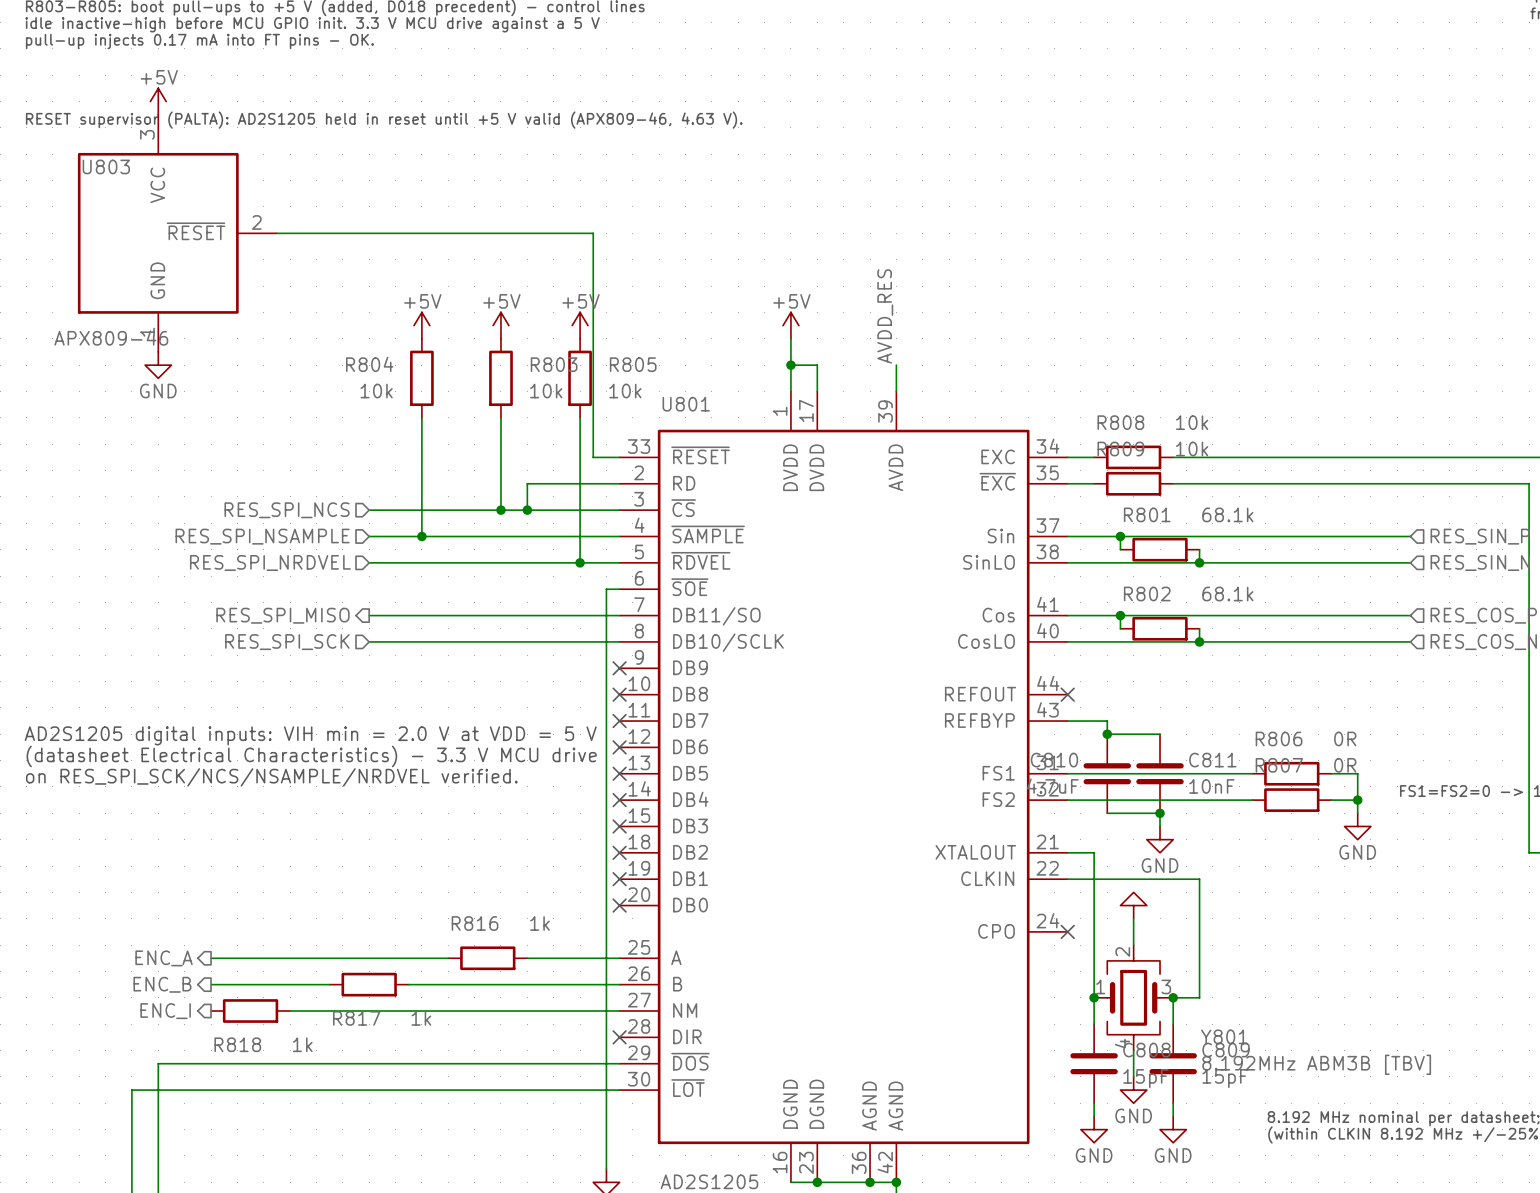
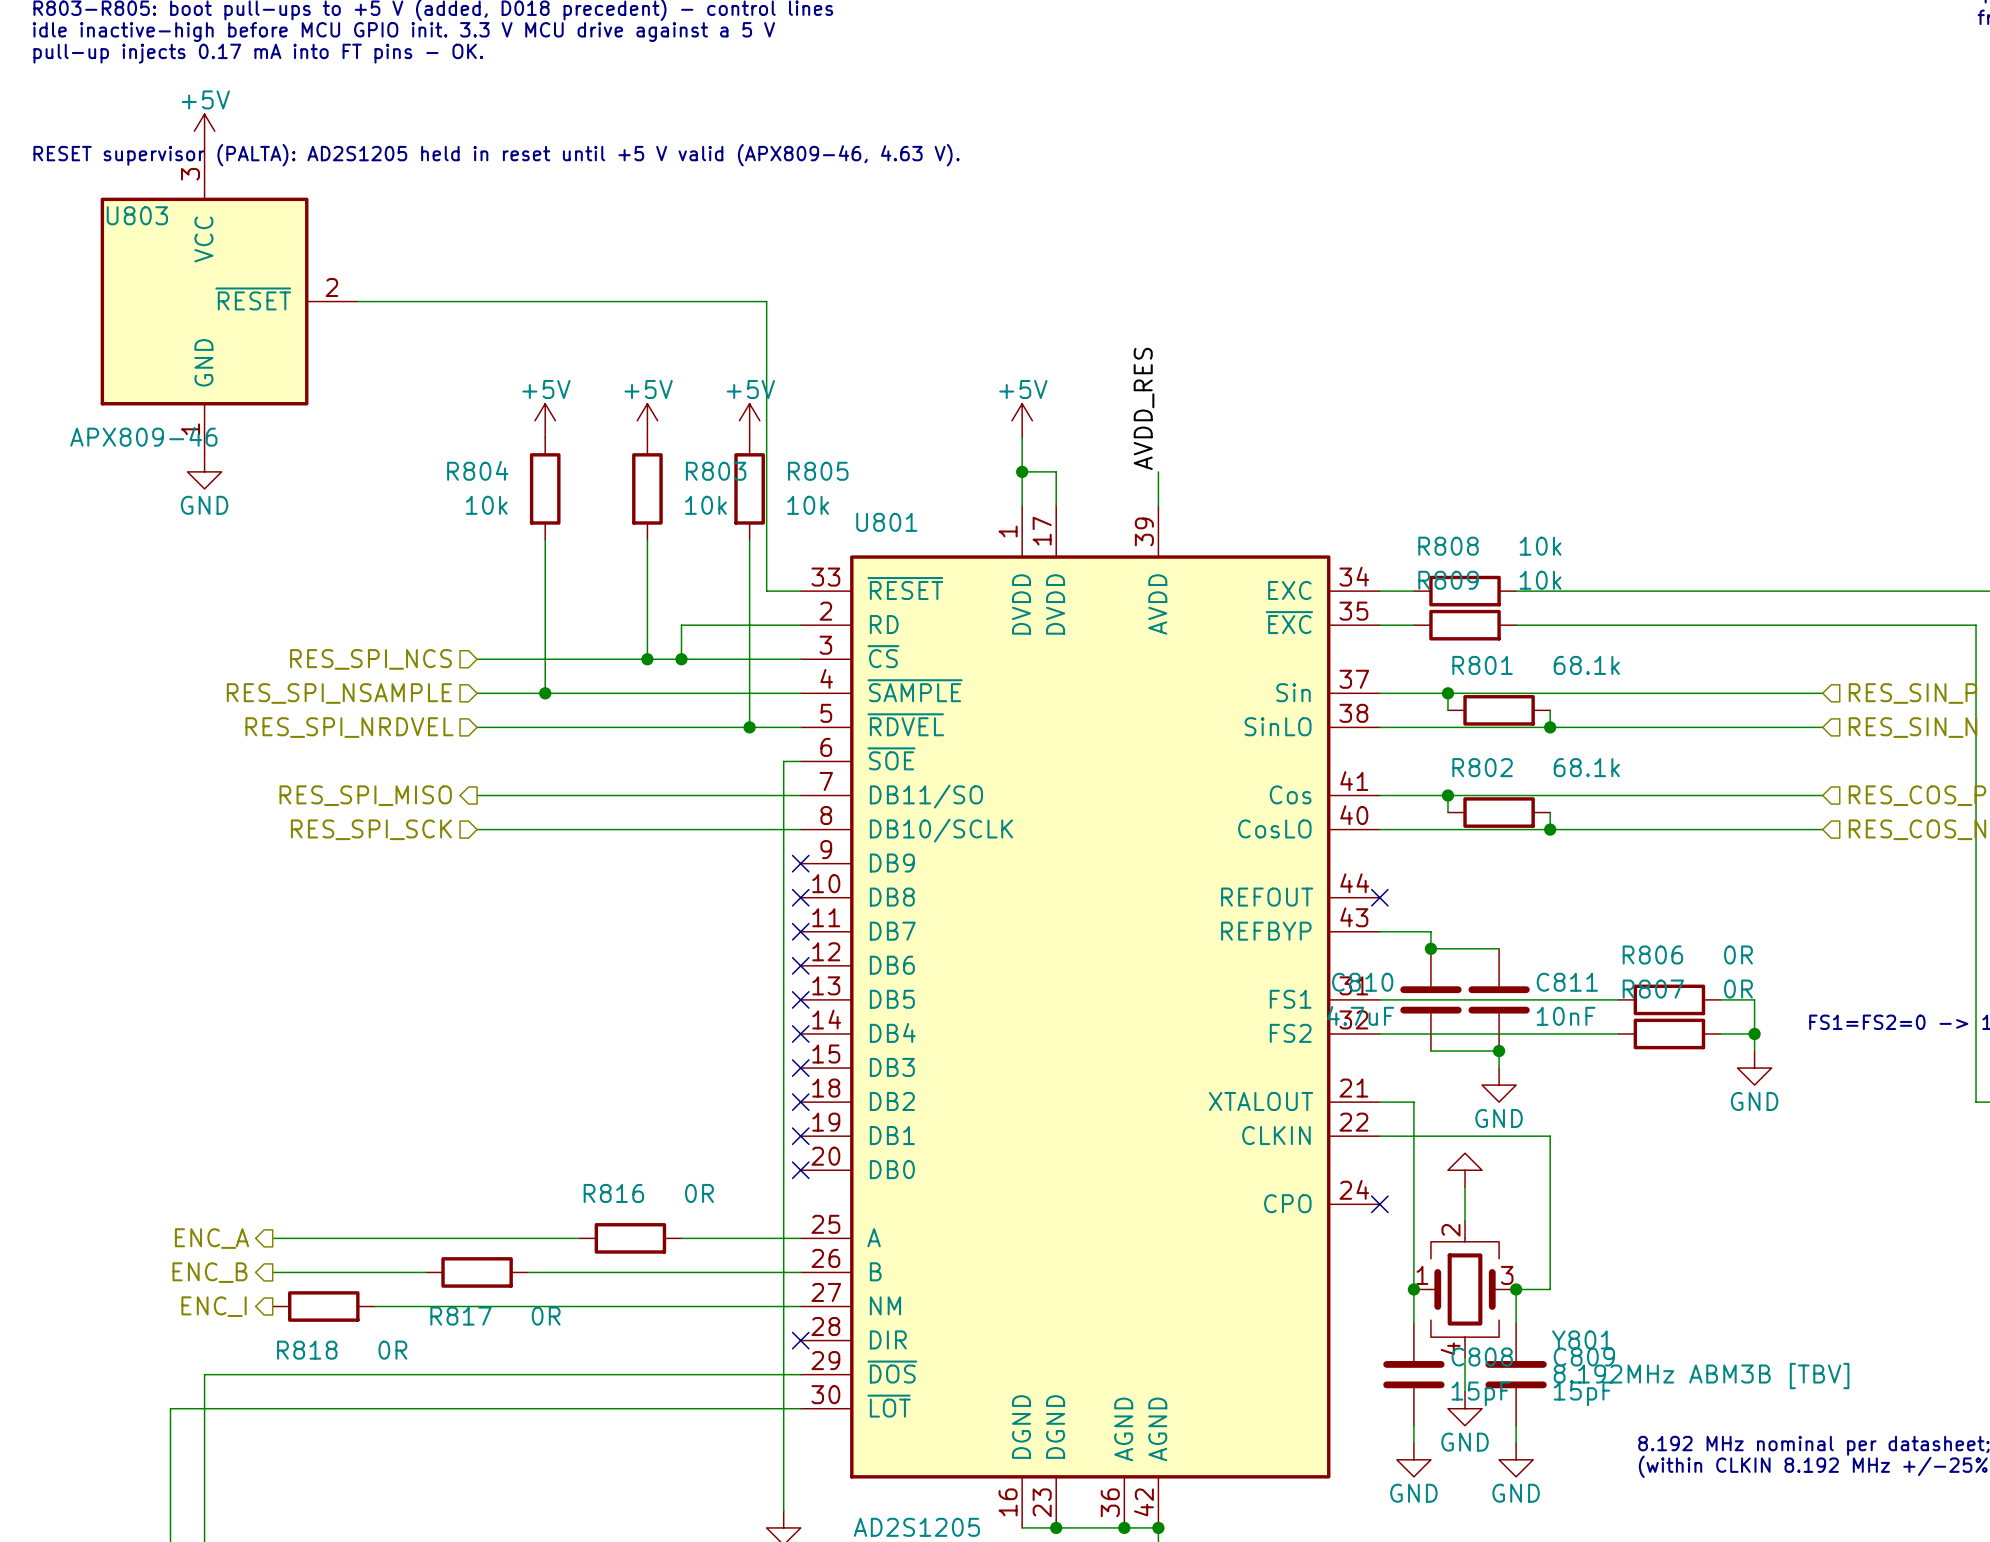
text: AD2S1205 digital inputs: VIH min = 2.0 V at VDD = 5 V (310, 735) -> none
text: (datasheet Electrical Characteristics) - 3.3 V MCU drive (311, 756) -> none
text: on RES_SPI_SCK/NCS/NSAMPLE/NRDVEL verified. (271, 777) -> none
R816 value: 1k (539, 923) -> 0R (699, 1193)
R817 value: 1k (421, 1018) -> 0R (546, 1316)
R818 value: 1k (302, 1044) -> 0R (392, 1350)

